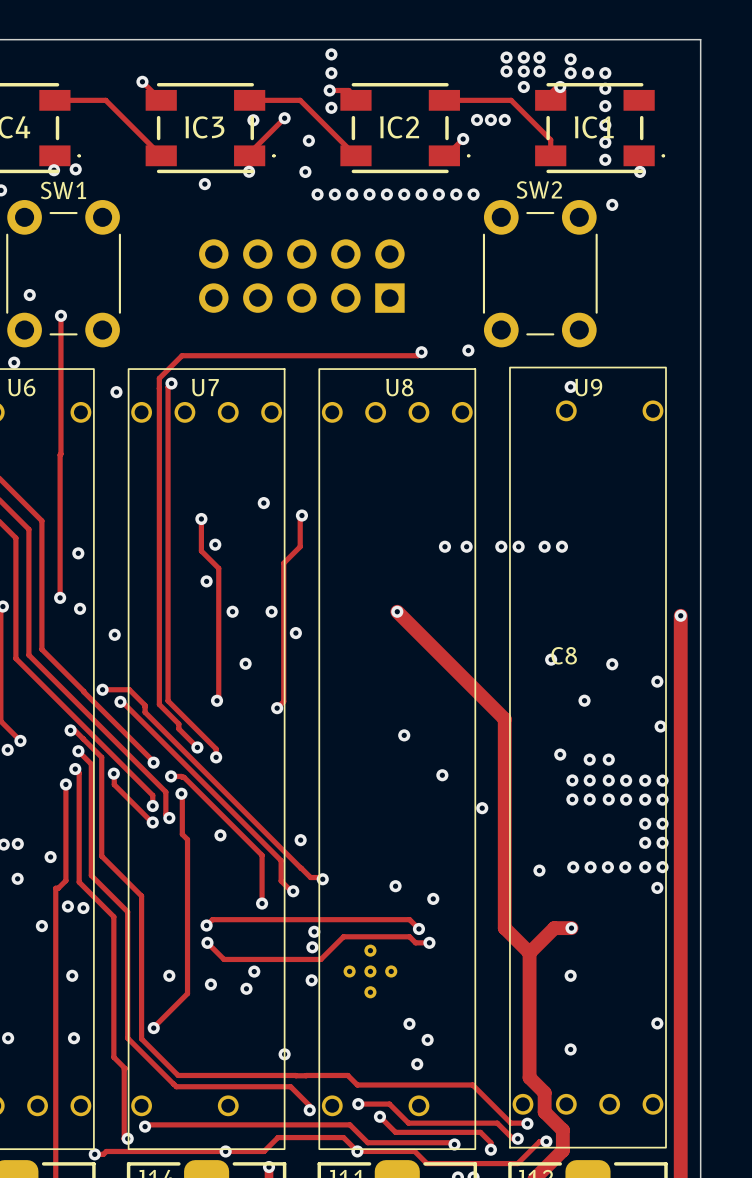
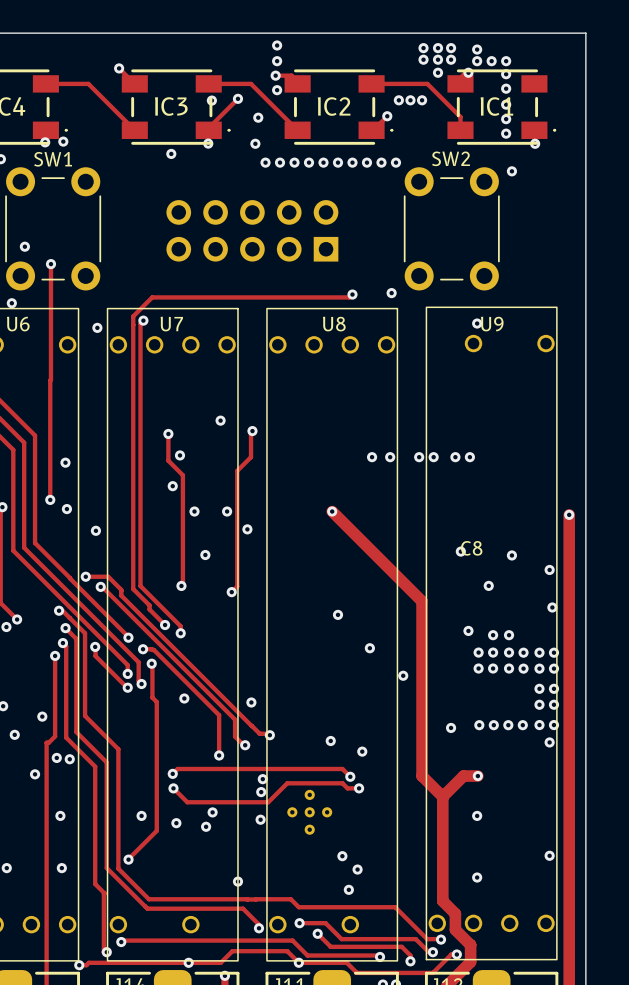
via: (17, 843) -> none

